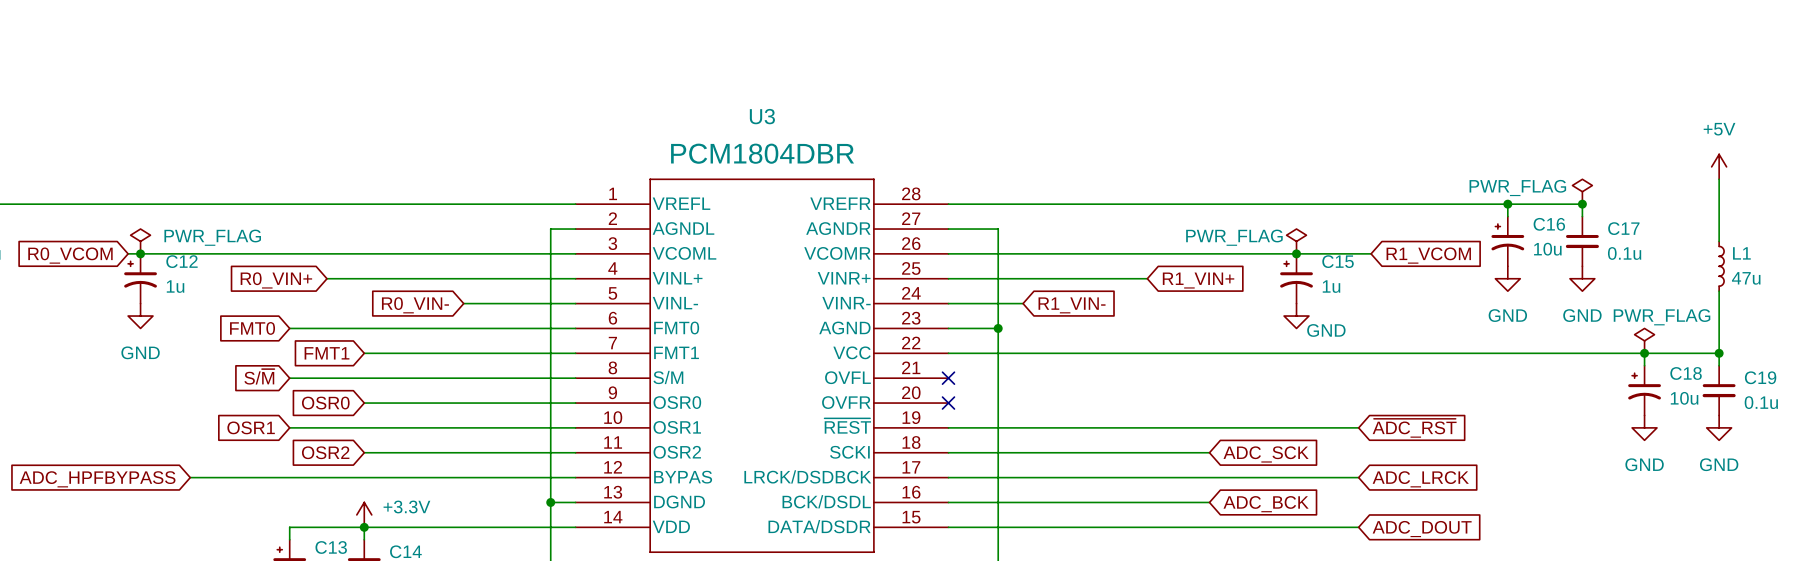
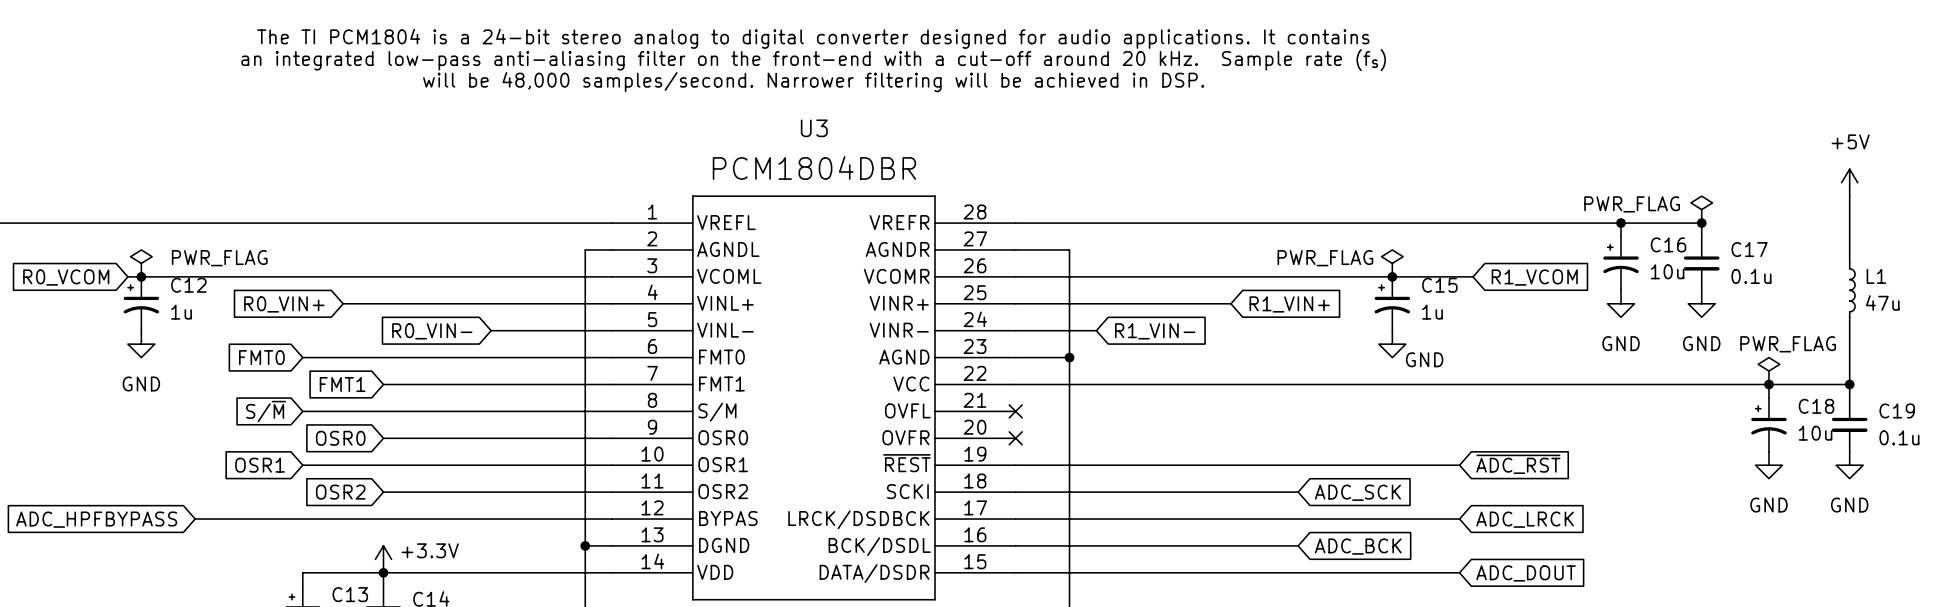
text: none -> The TI PCM1804 is a 24-bit stereo analog to digital converter designed for audio applications. It contains (813, 38)
text: none -> an integrated low-pass anti-aliasing filter on the front-end with a cut-off around 20 kHz. Sample rate (fs) (813, 60)
text: none -> will be 48,000 samples/second. Narrower filtering will be achieved in DSP. (813, 82)

